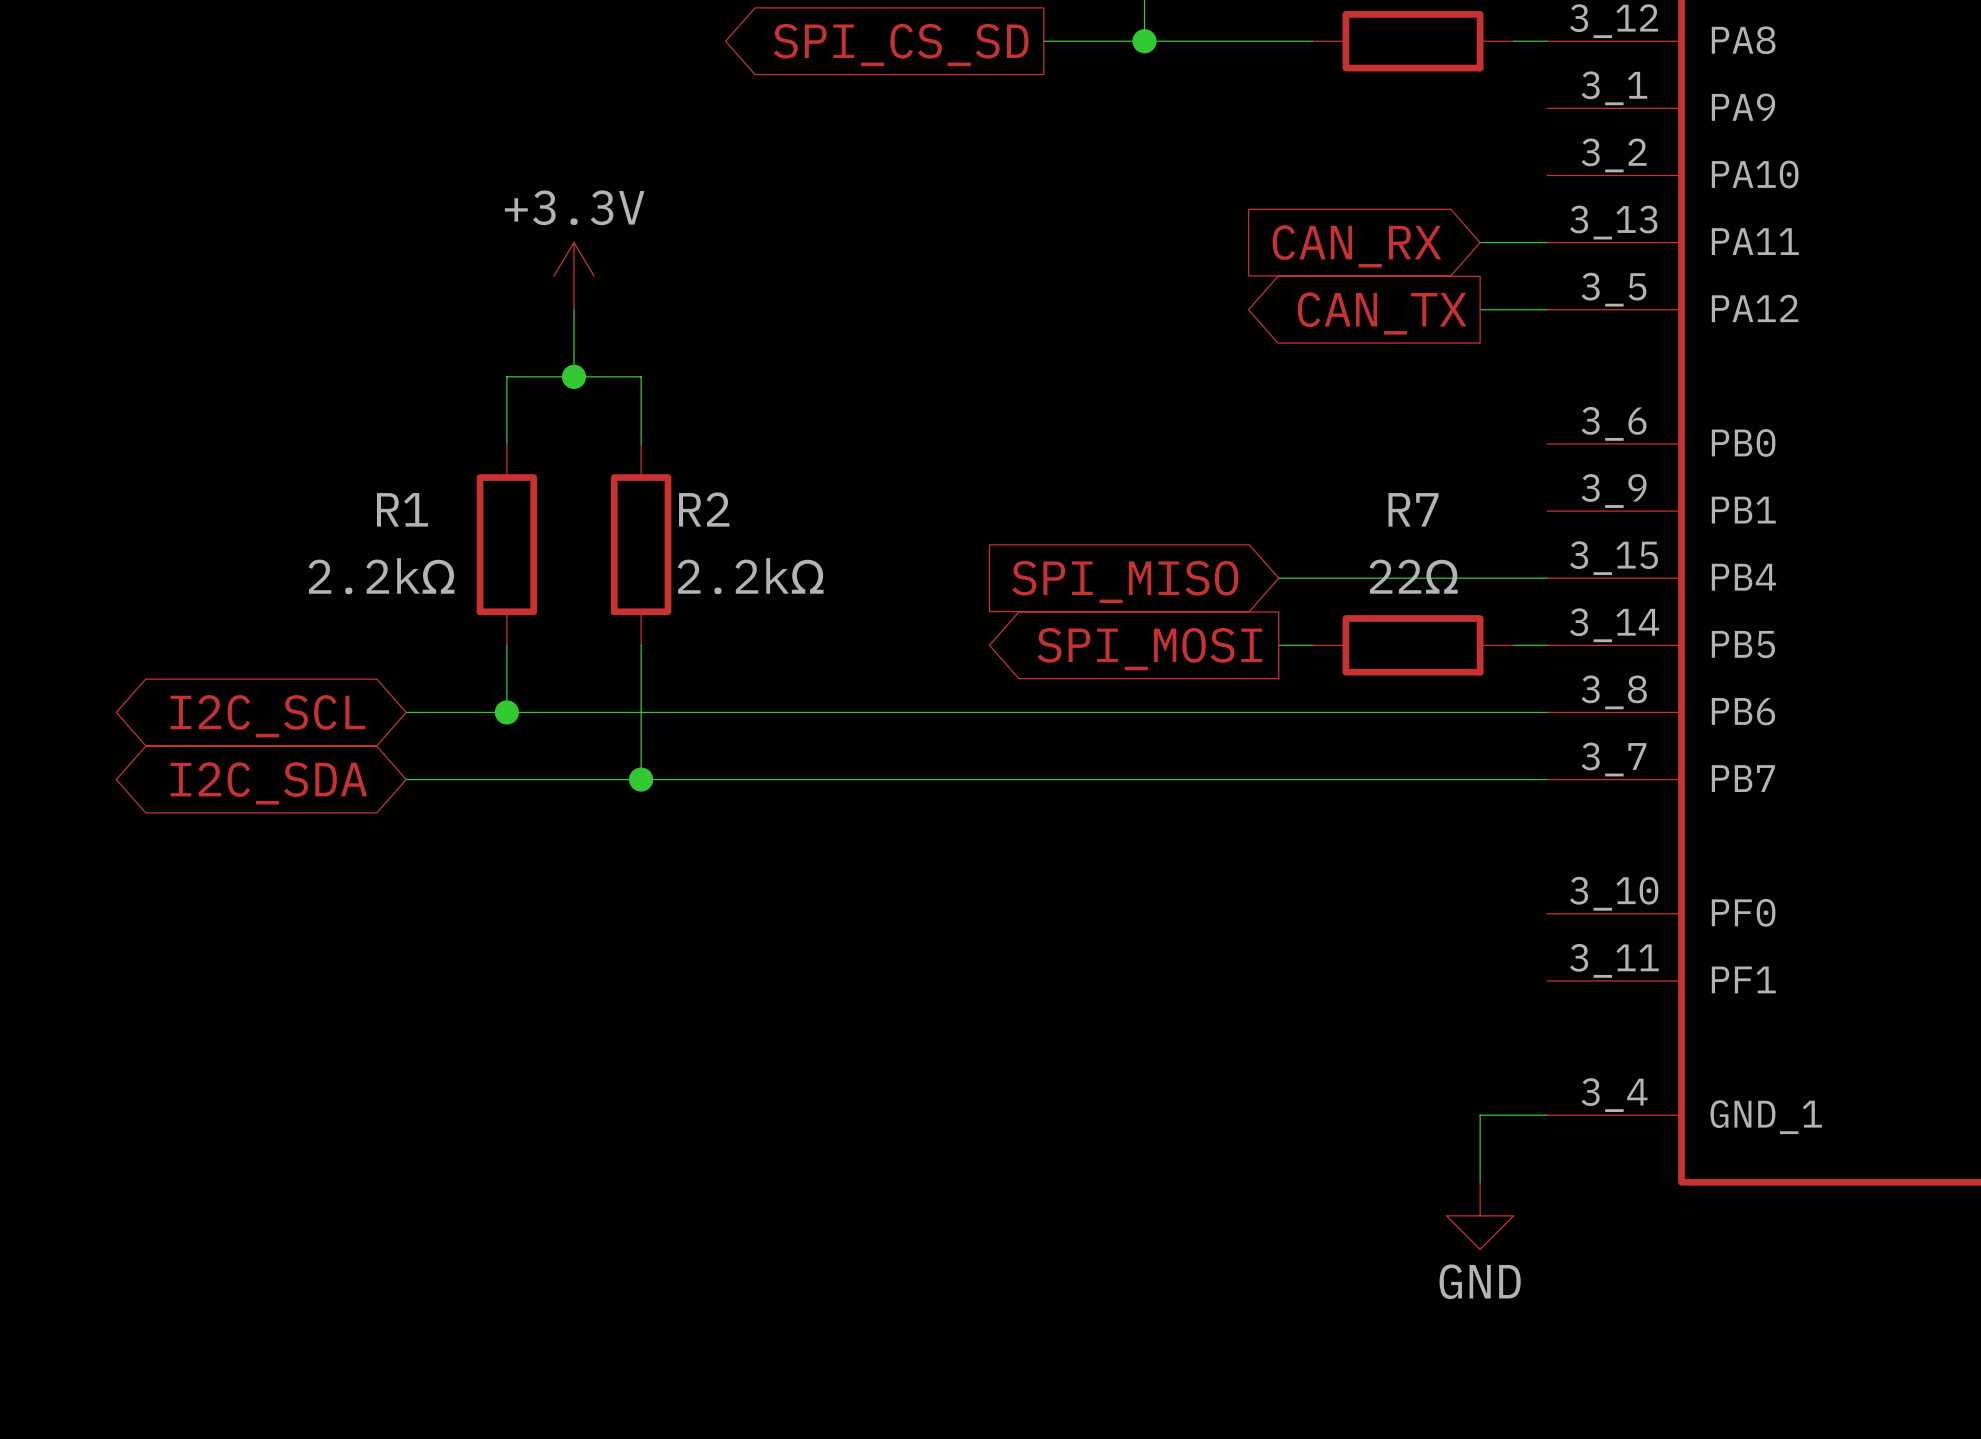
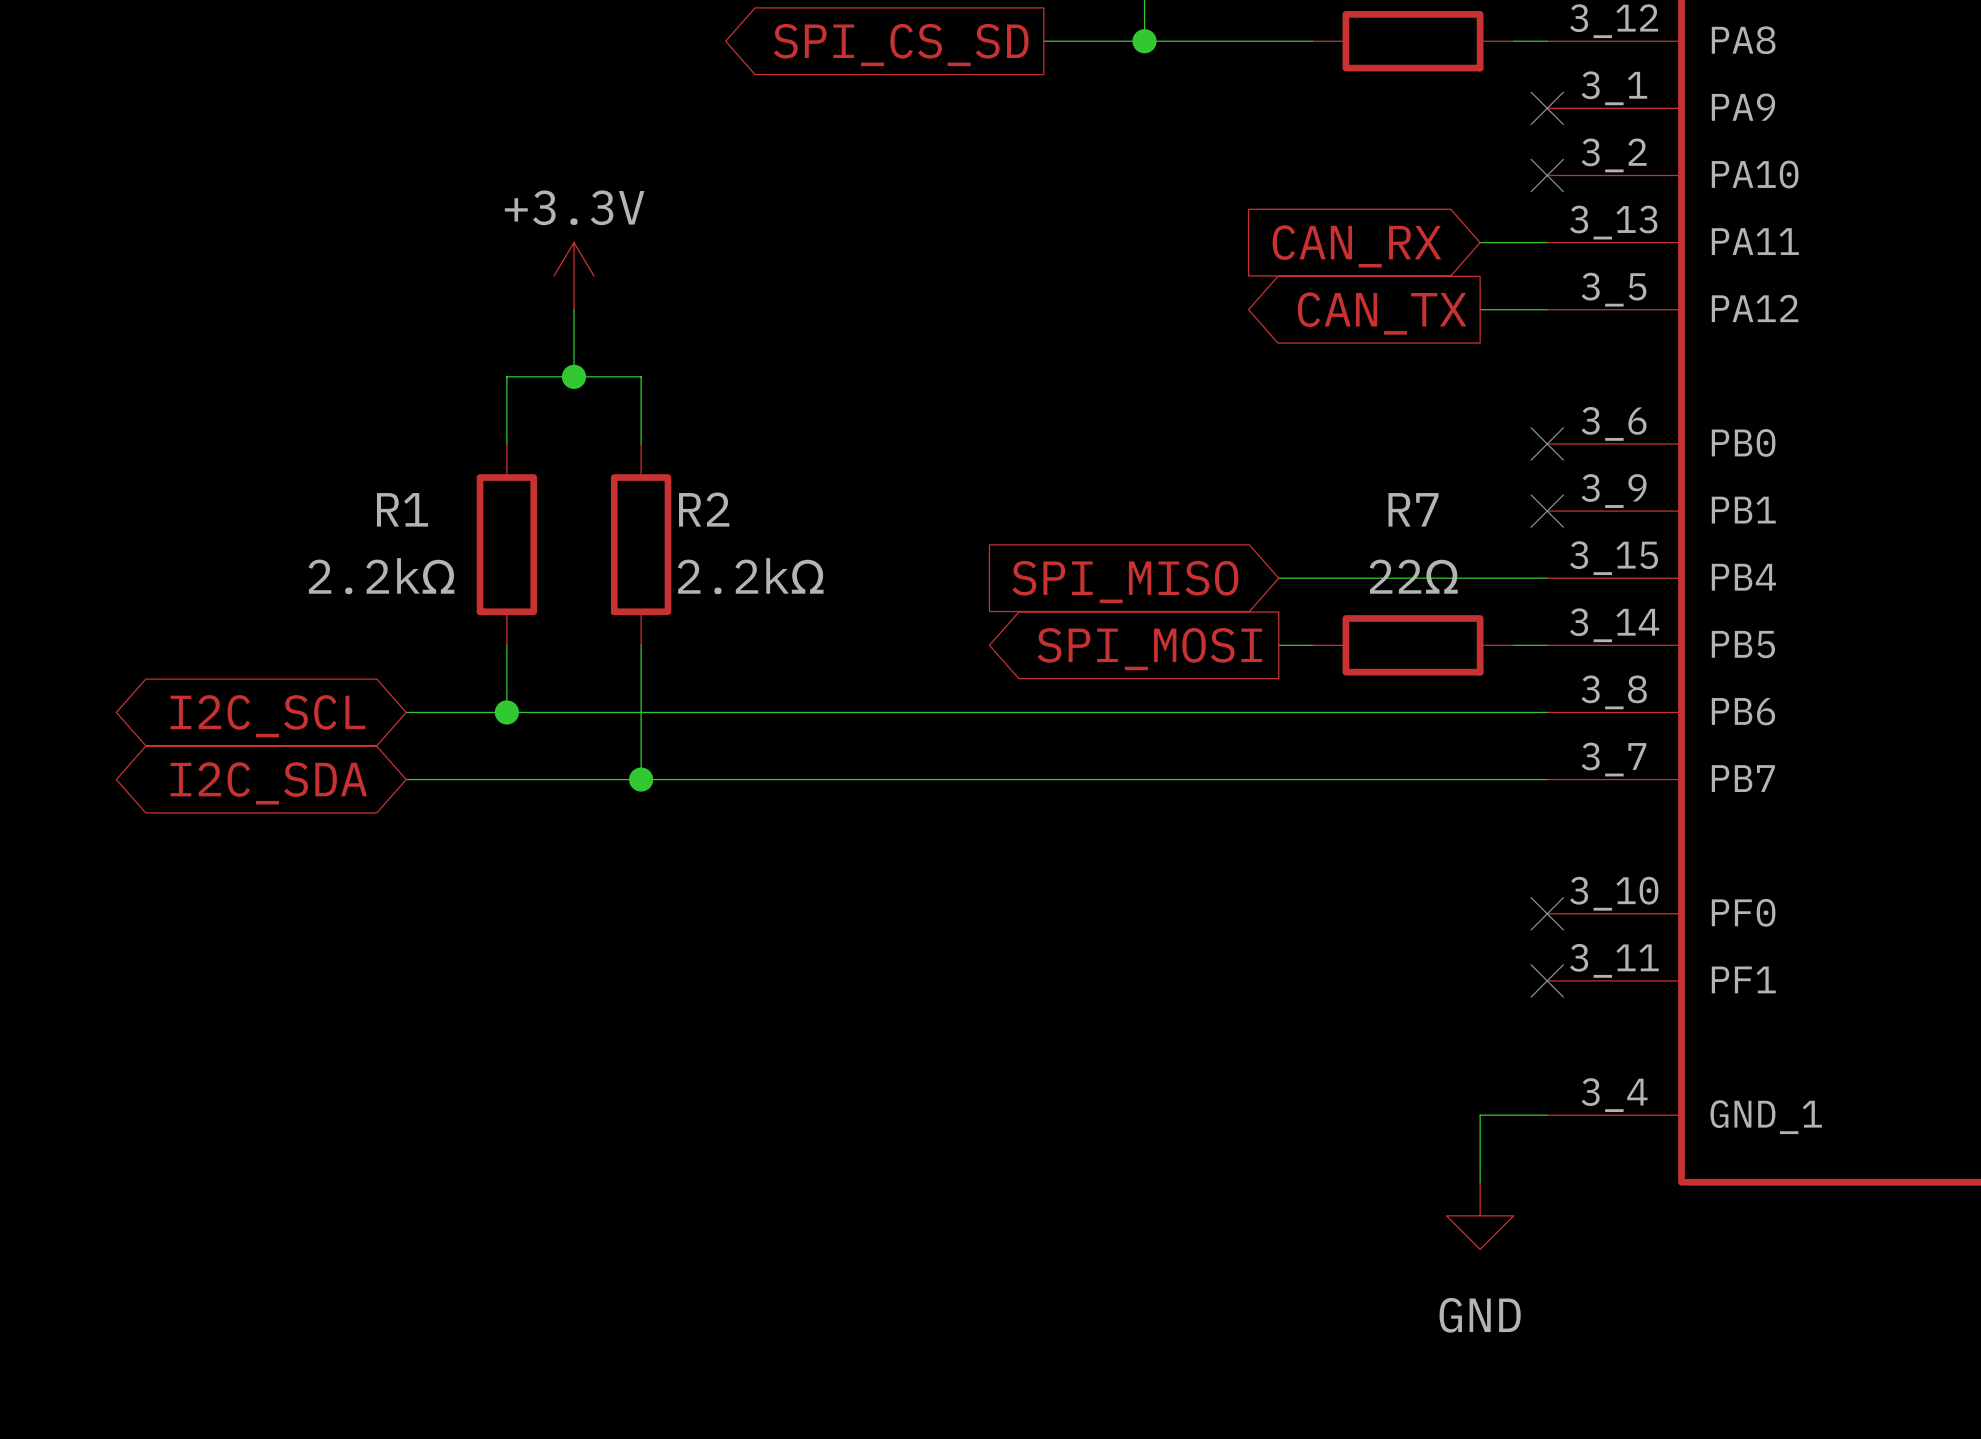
no-connect mark: none -> (1547, 108)
no-connect mark: none -> (1547, 175)
no-connect mark: none -> (1547, 443)
no-connect mark: none -> (1547, 511)
no-connect mark: none -> (1547, 913)
no-connect mark: none -> (1547, 980)
power symbol text position: GND (1480, 1281) -> GND (1480, 1315)

